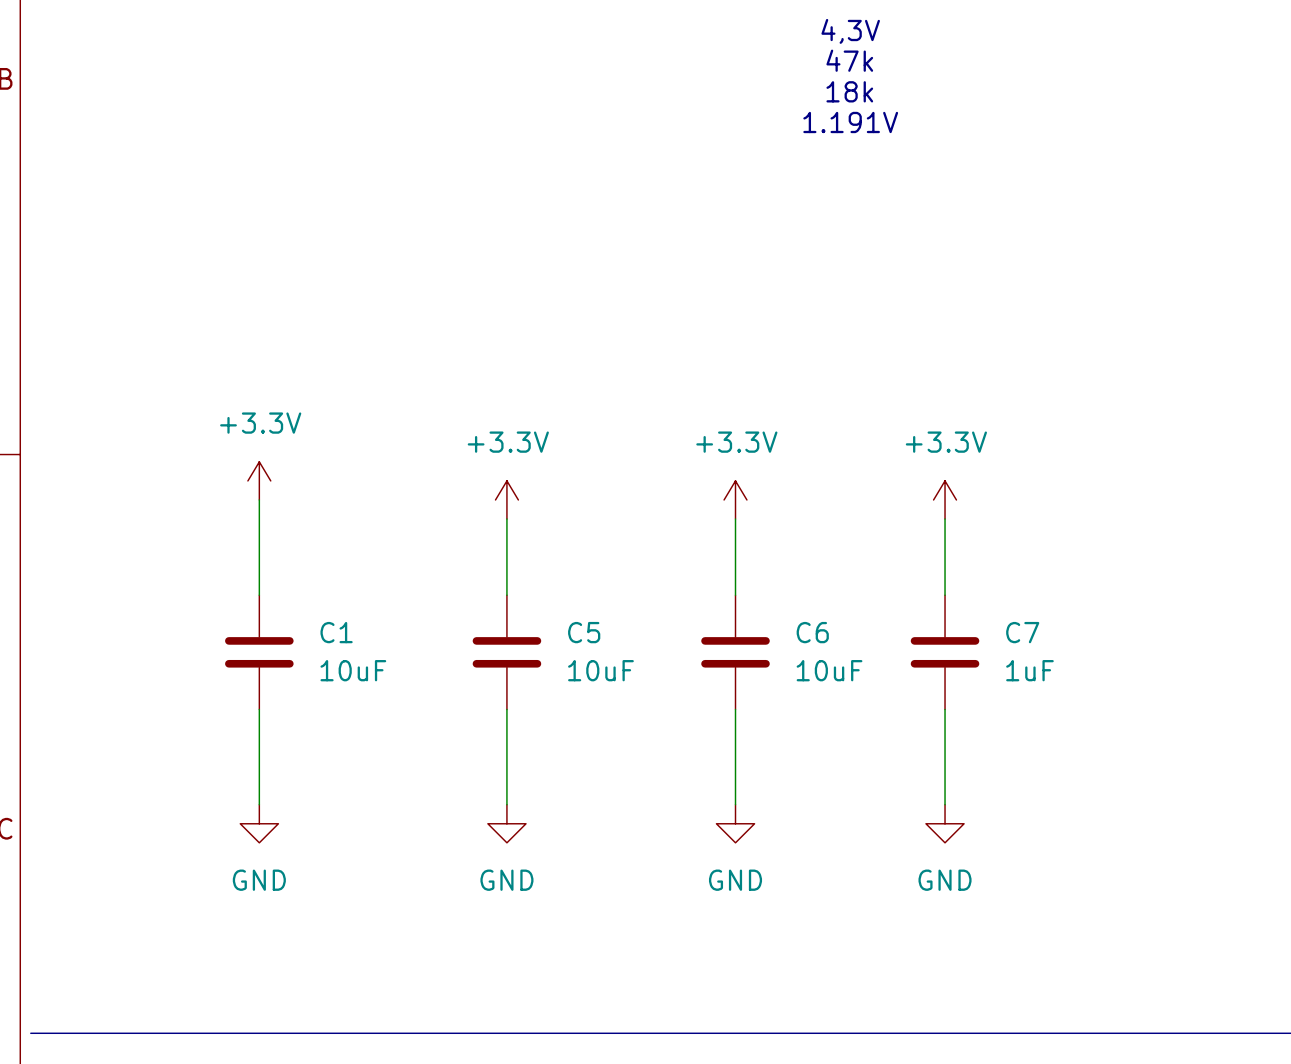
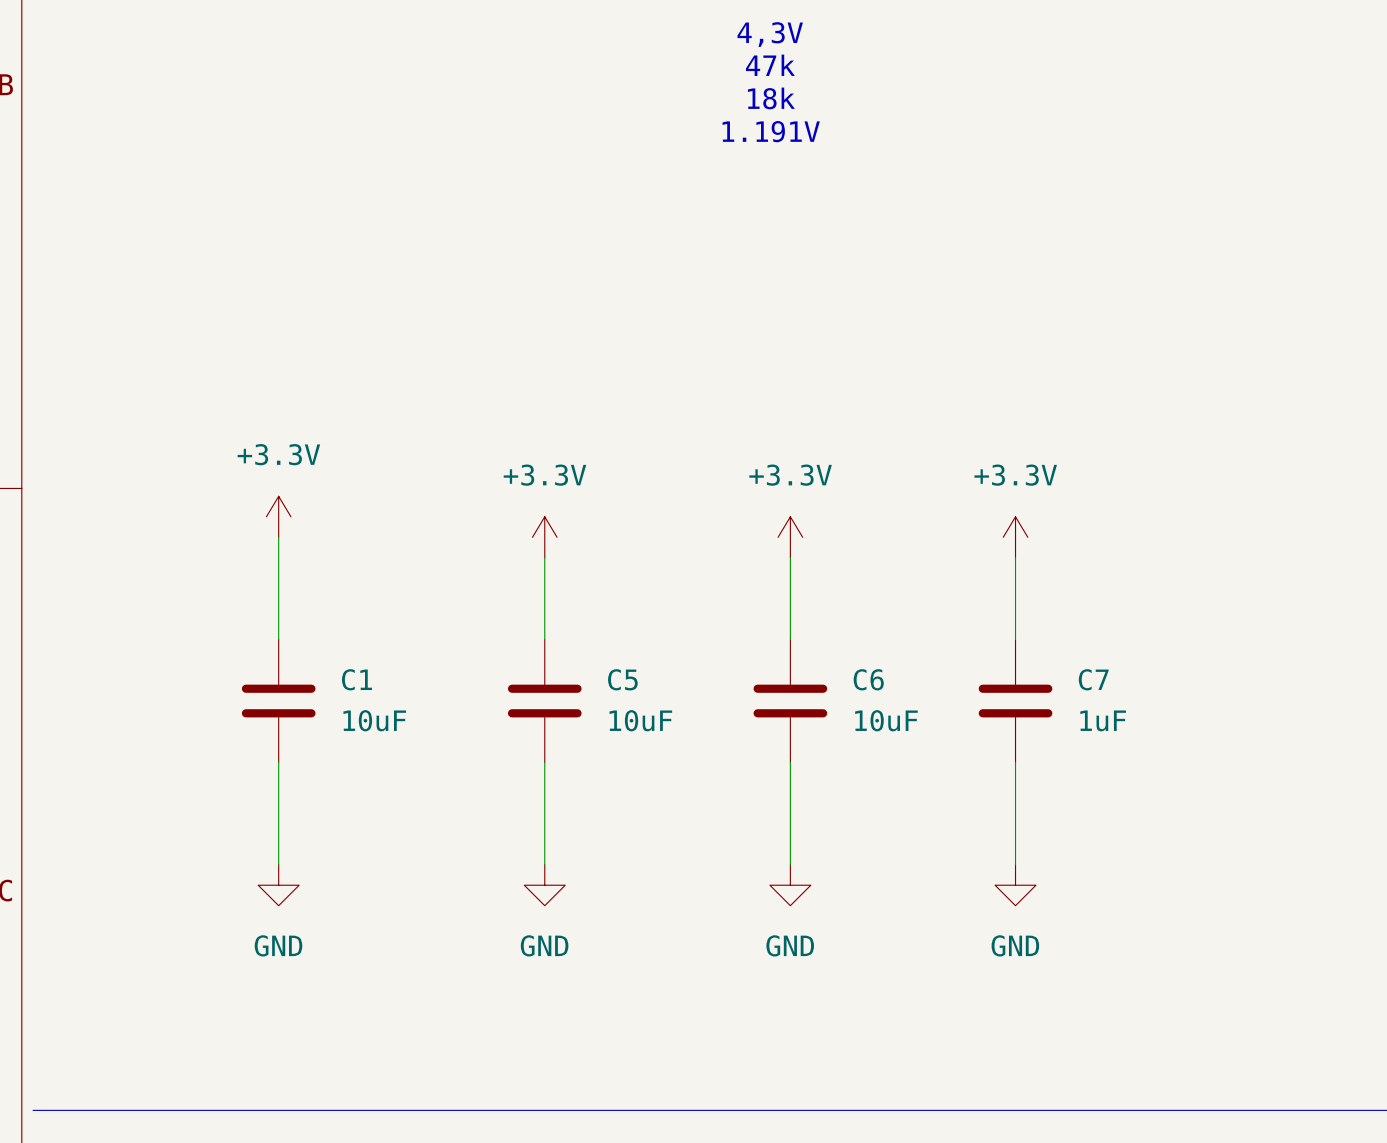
text position: 4,3V (850, 31) -> 4,3V (770, 34)
text position: 47k (849, 60) -> 47k (770, 65)
text position: 18k (849, 91) -> 18k (771, 98)
text position: 1.191V (850, 122) -> 1.191V (771, 131)

